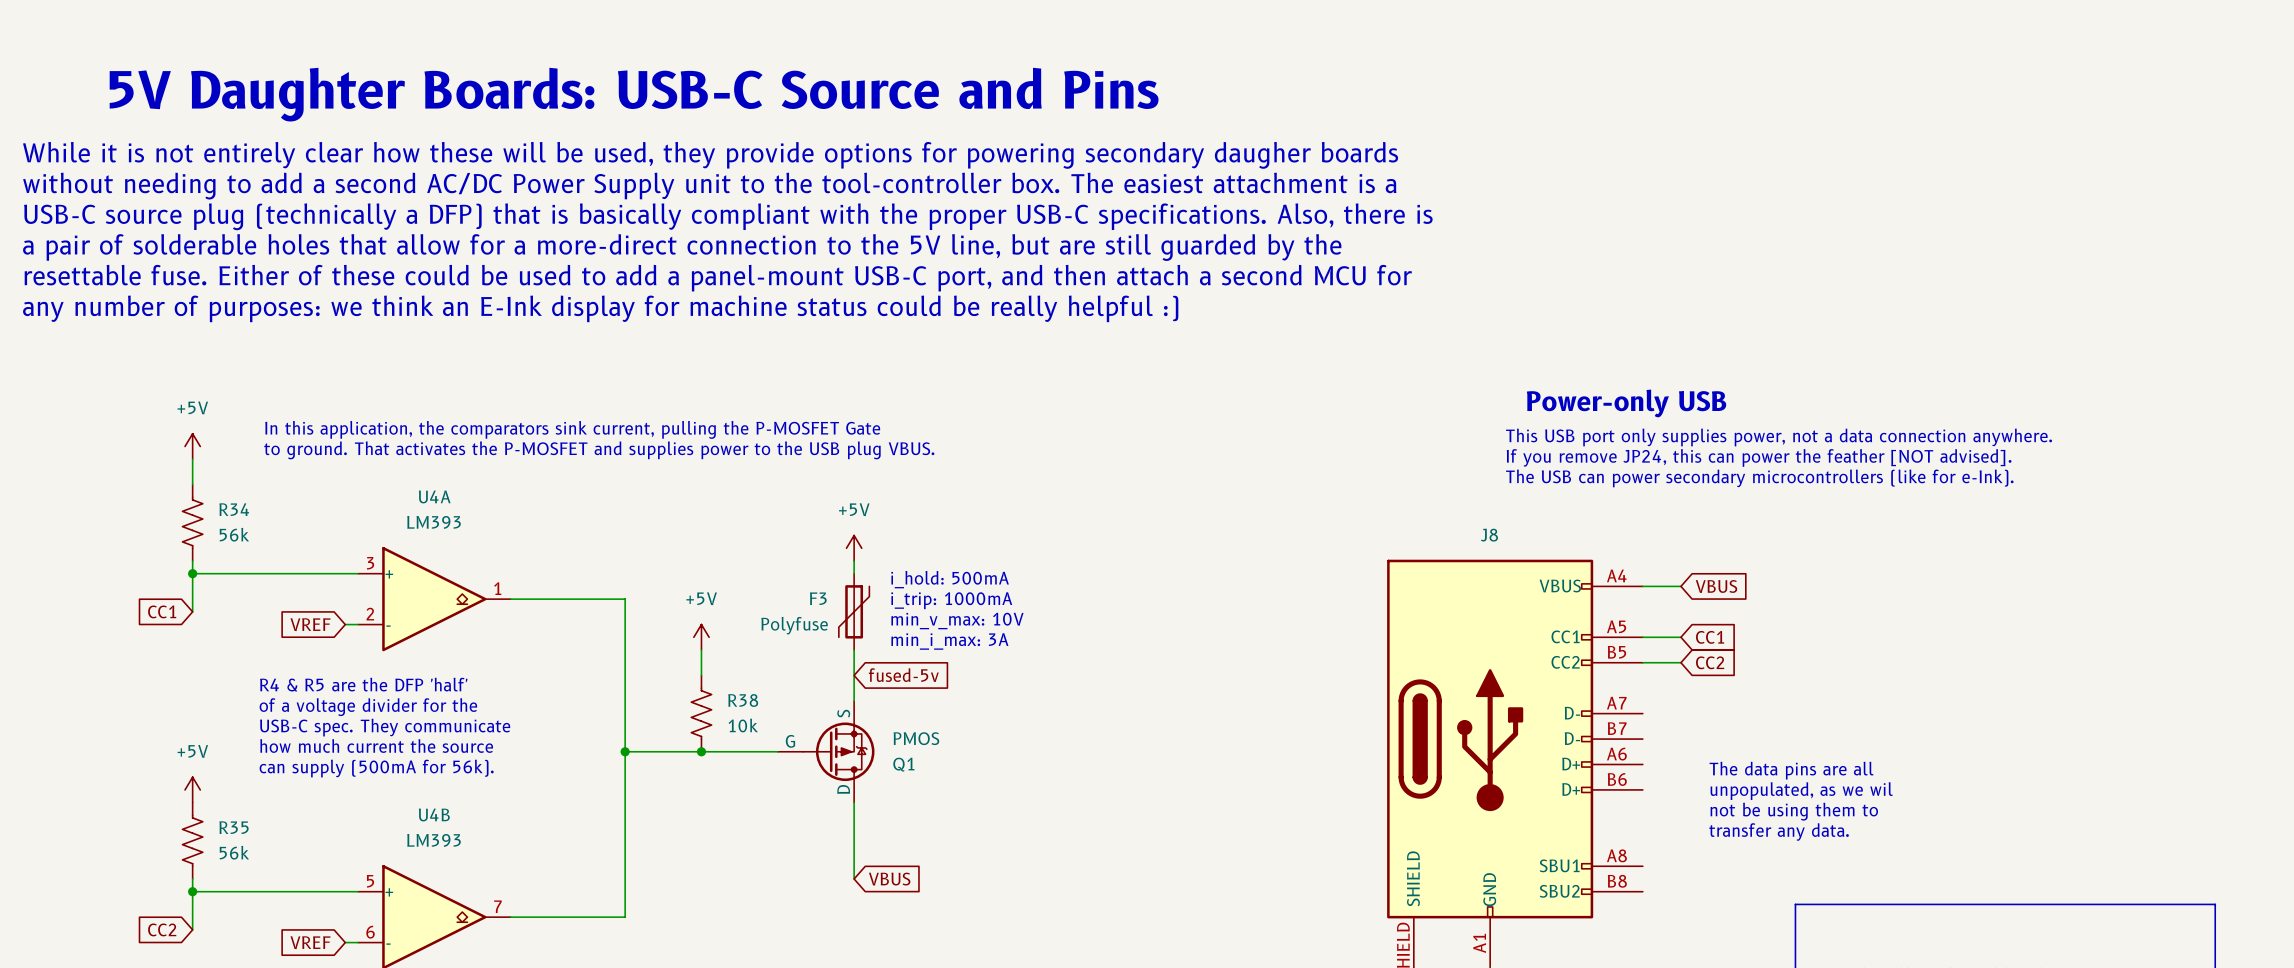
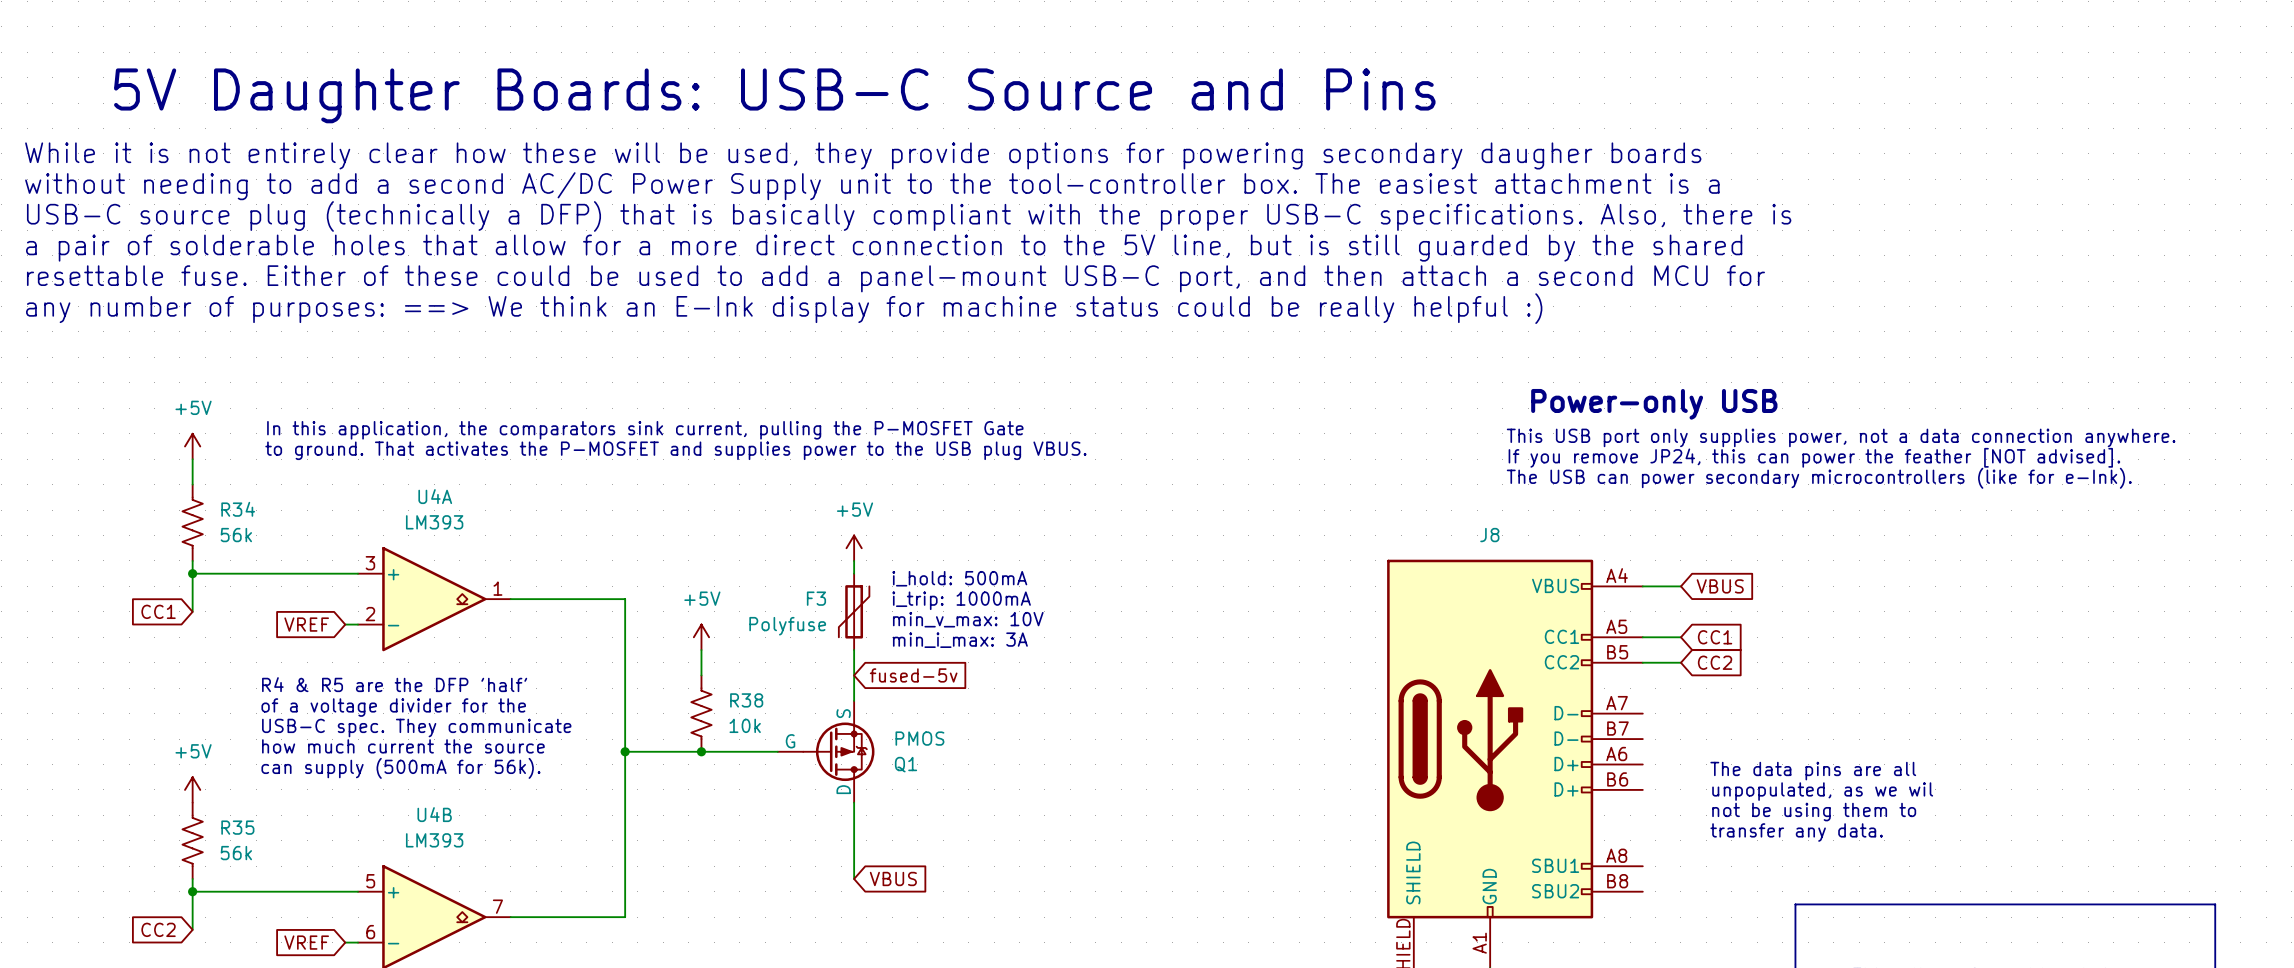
text: a pair of solderable holes that allow for a more-direct connection to the 5V line, but are still guarded by the (682, 247) -> a pair of solderable holes that allow for a more direct connection to the 5V line, but is still guarded by the shared (884, 248)
text: any number of purposes: we think an E-Ink display for machine status could be really helpful :) (600, 308) -> any number of purposes: ==> We think an E-Ink display for machine status could be really helpful :) (784, 308)

